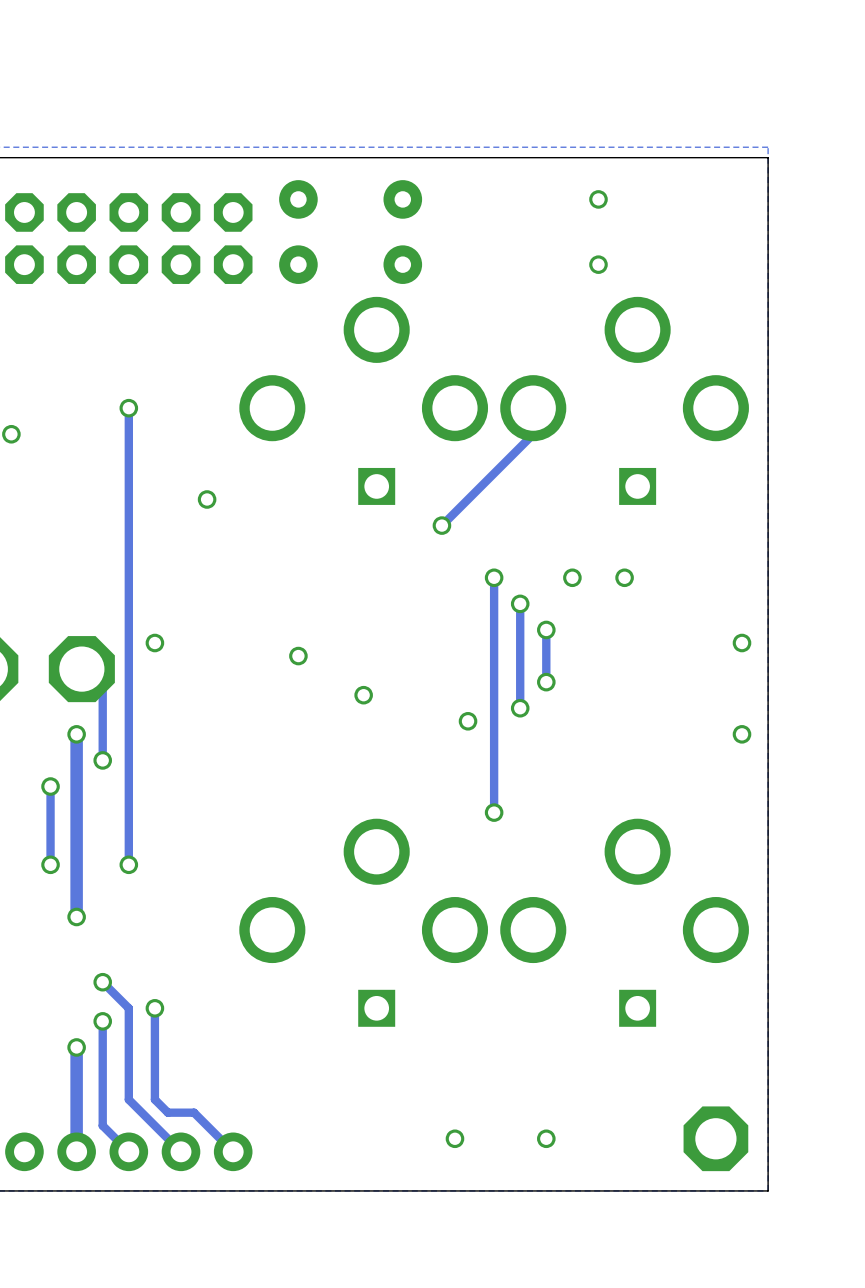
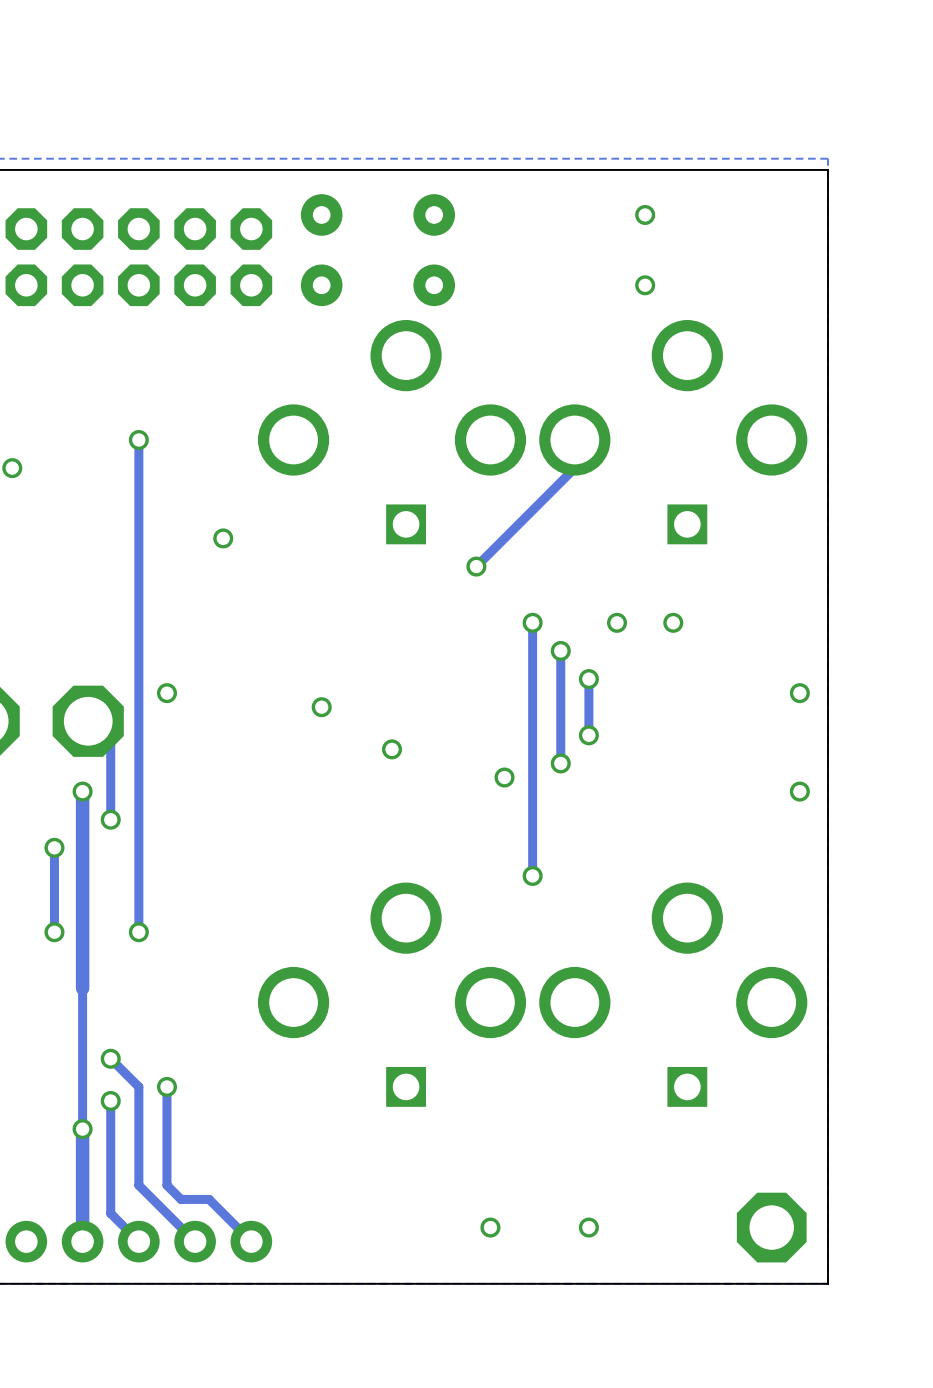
track: none -> (82, 988) (82, 1129)
via: (76, 916) -> none

